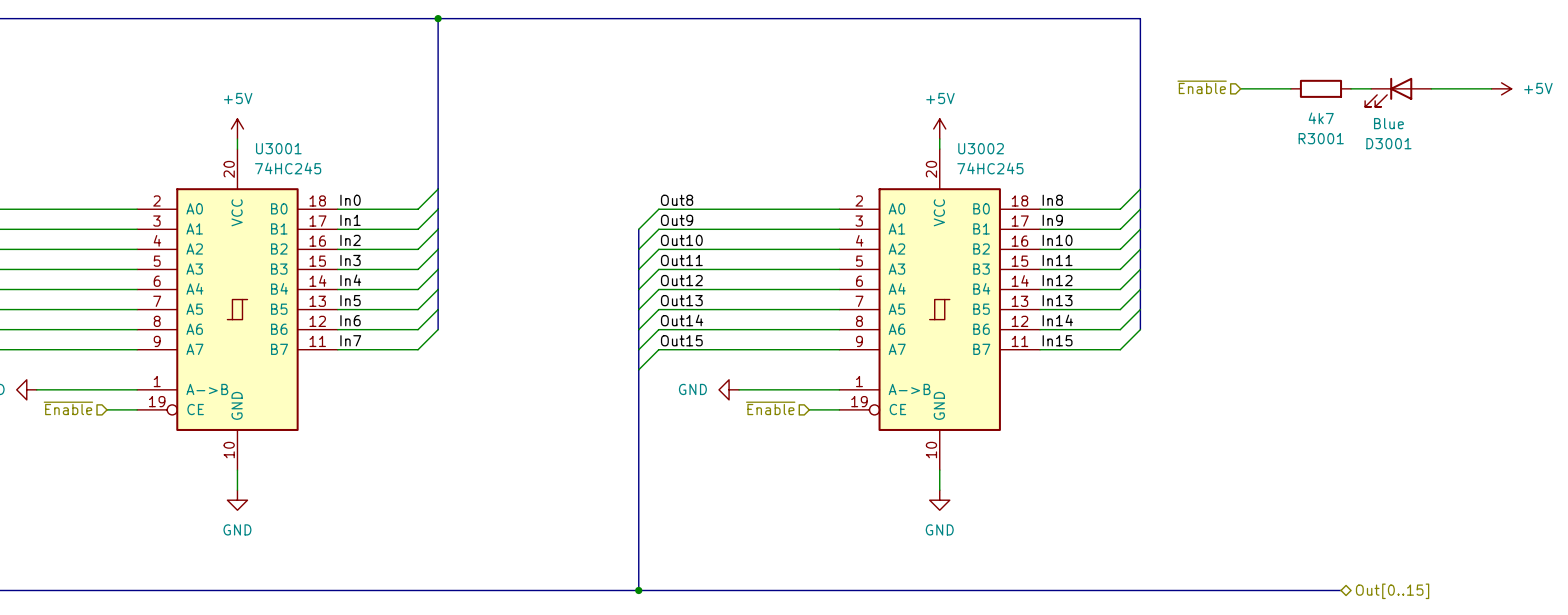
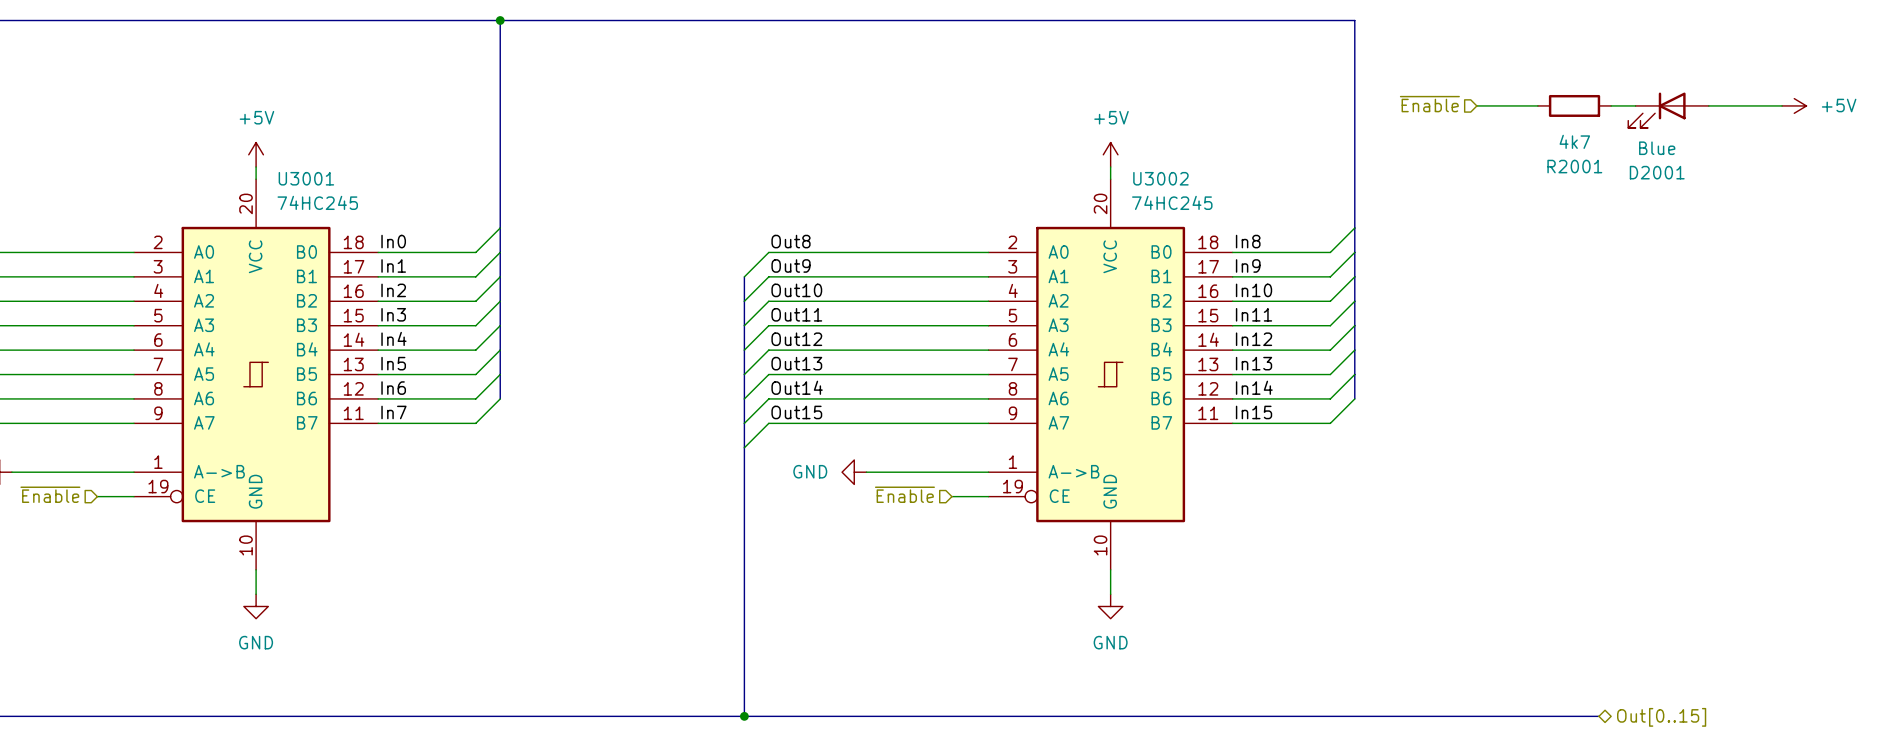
R3001 name: R3001 (1321, 138) -> R2001 (1574, 166)
D3001 name: D3001 (1388, 143) -> D2001 (1657, 172)

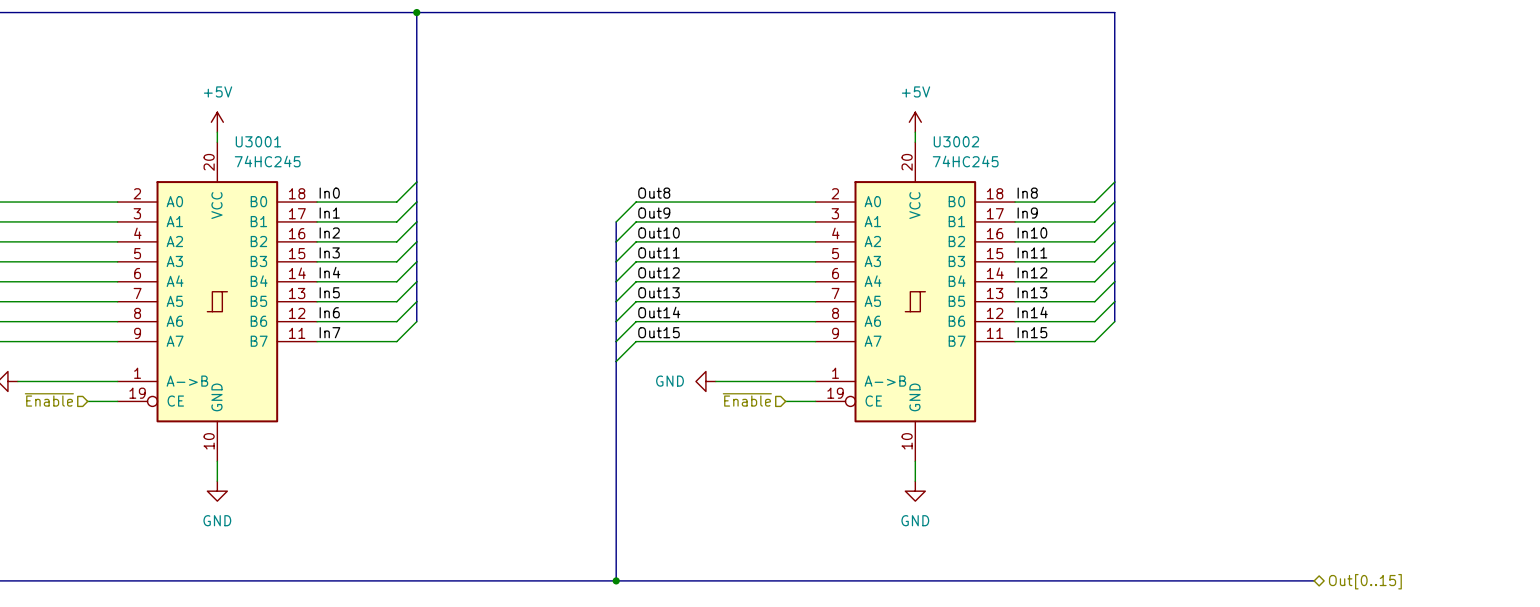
hierarchical label: ~{Enable} (1429, 104) -> none
wire: (1476, 105) (1537, 105) -> none
R2001: 4k7 (1574, 105) -> none
wire: (1611, 105) (1635, 105) -> none
wire: (1708, 105) (1782, 105) -> none
power symbol: +5V (1794, 105) -> none
D2001: Blue (1668, 110) -> none

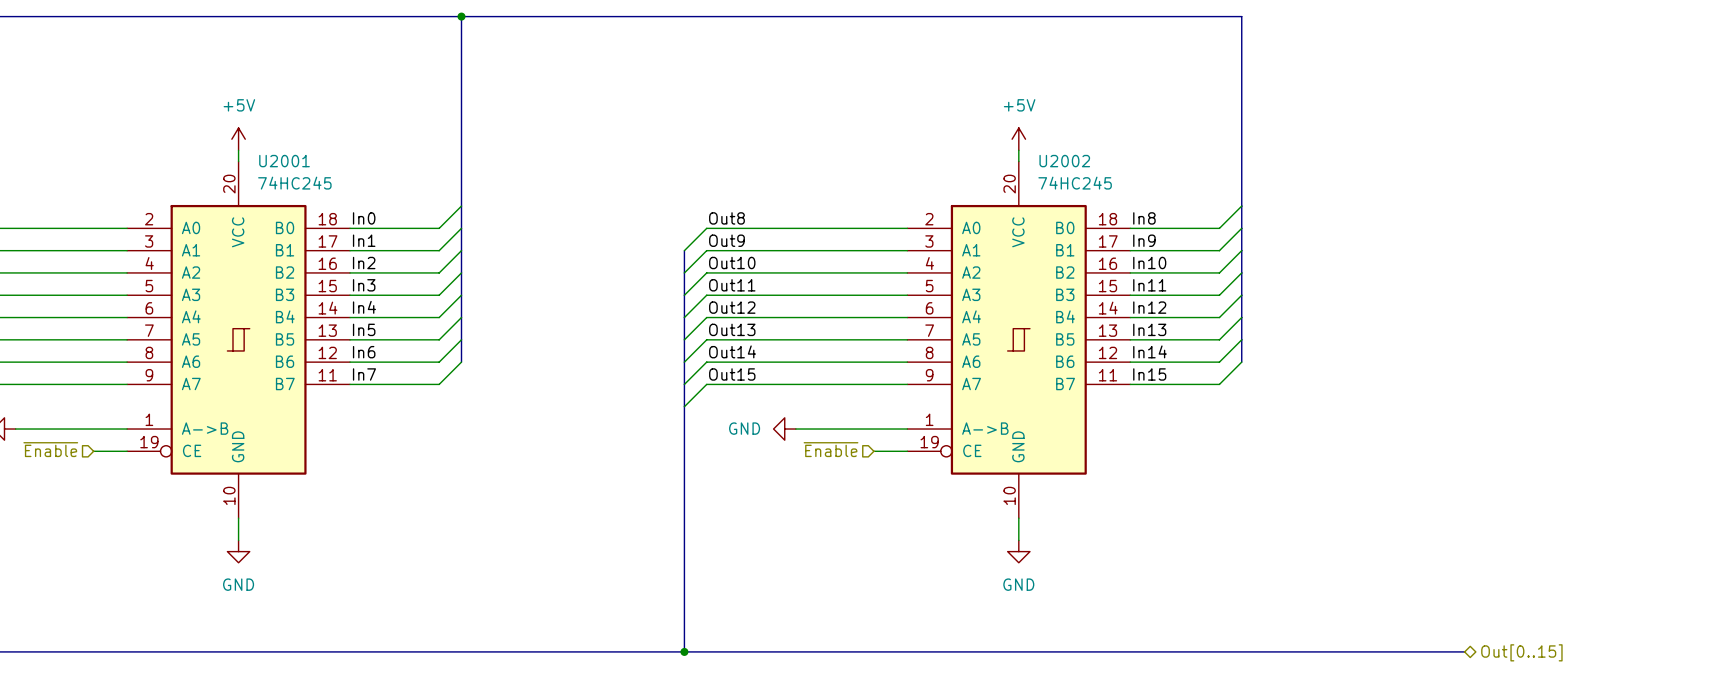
U3001 name: U3001 (258, 141) -> U2001 (284, 161)
U3002 name: U3002 (956, 141) -> U2002 (1064, 161)

